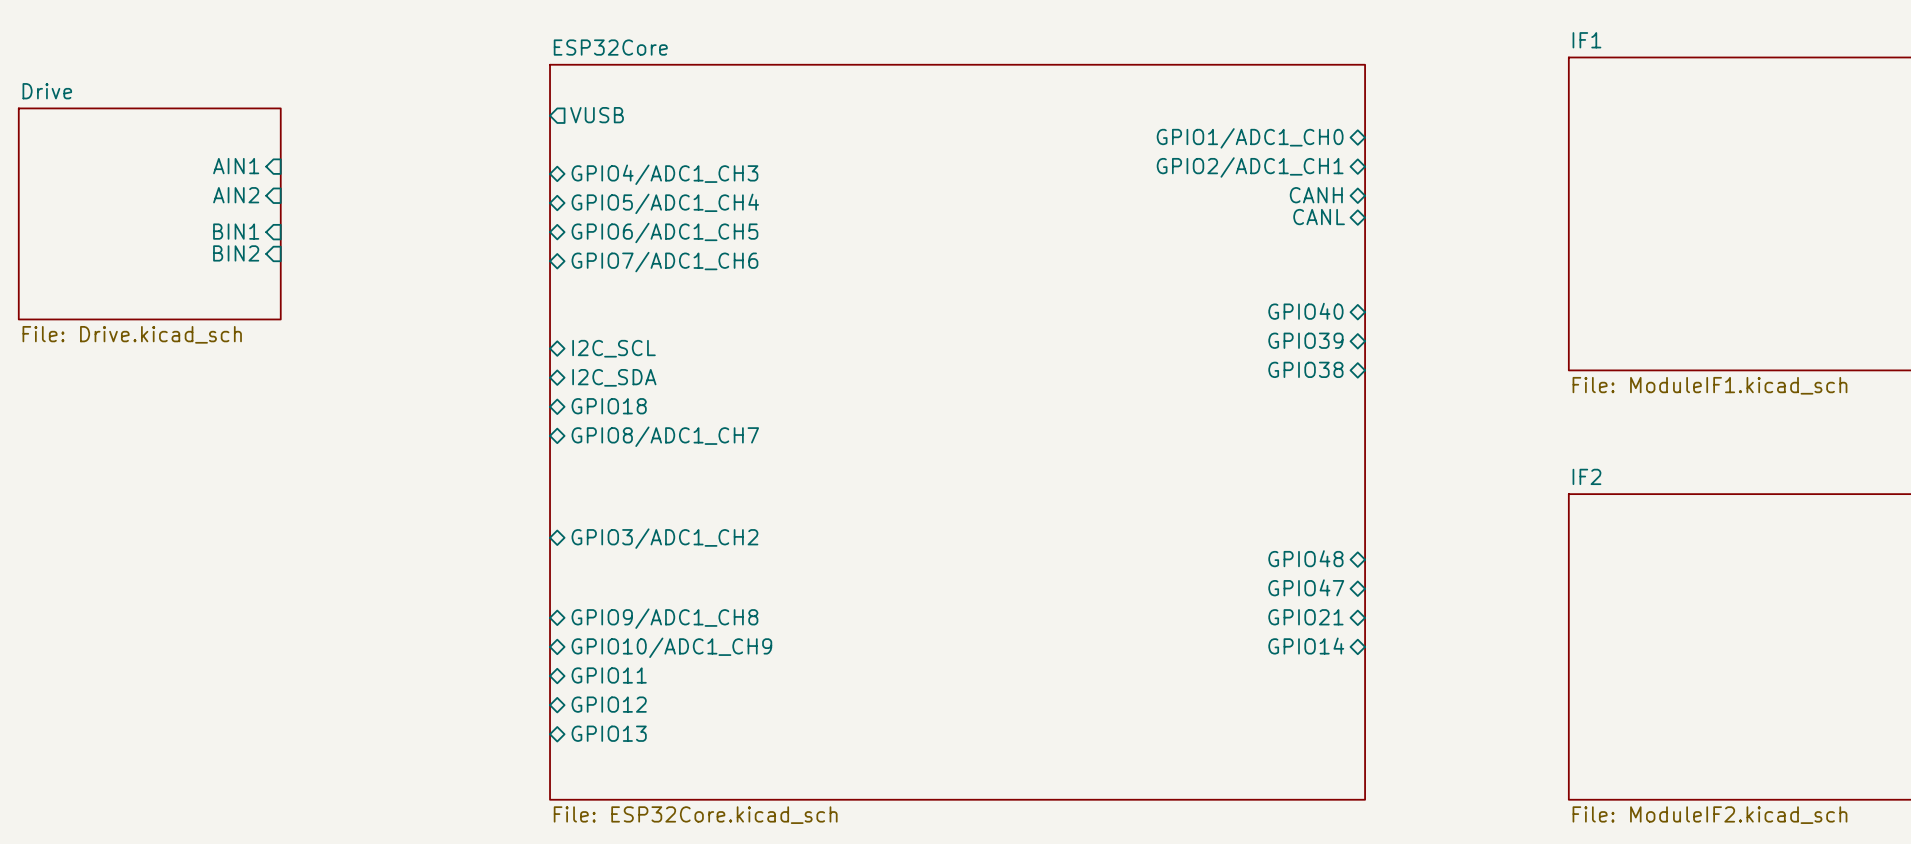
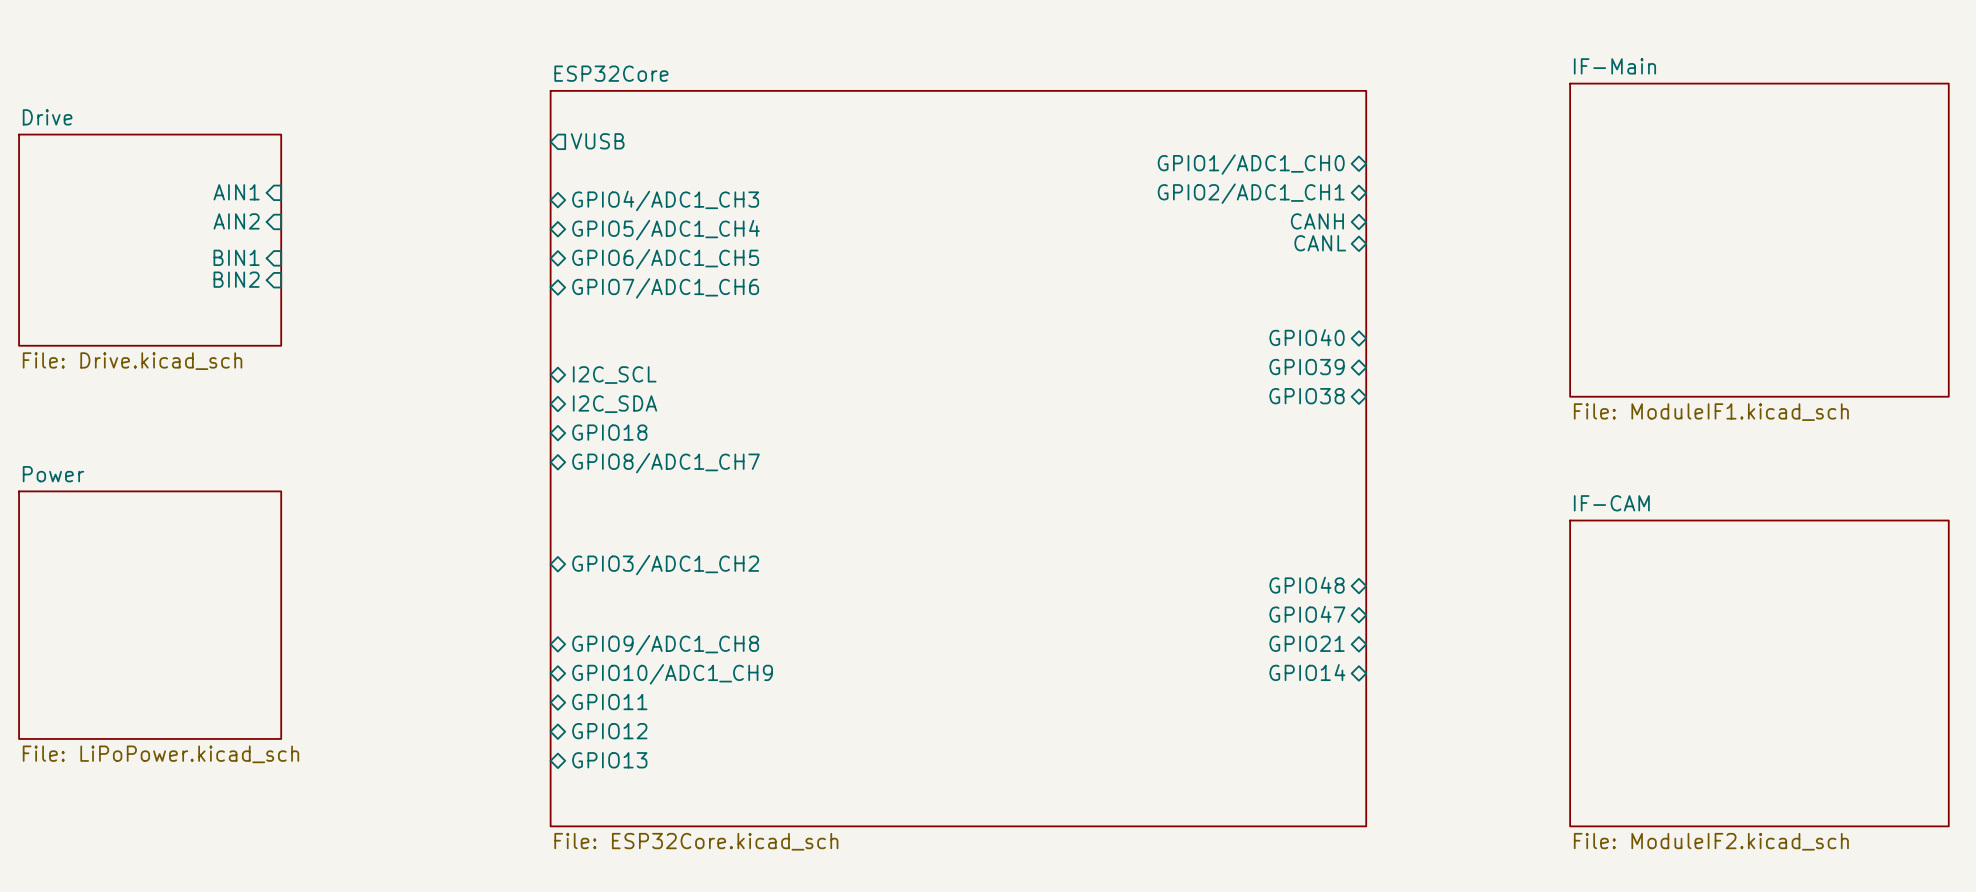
sheet IF1 name: IF1 (1586, 40) -> IF-Main (1614, 66)
sheet IF2 name: IF2 (1586, 476) -> IF-CAM (1611, 503)
sheet Power: none -> File: LiPoPower.kicad_sch (150, 615)

